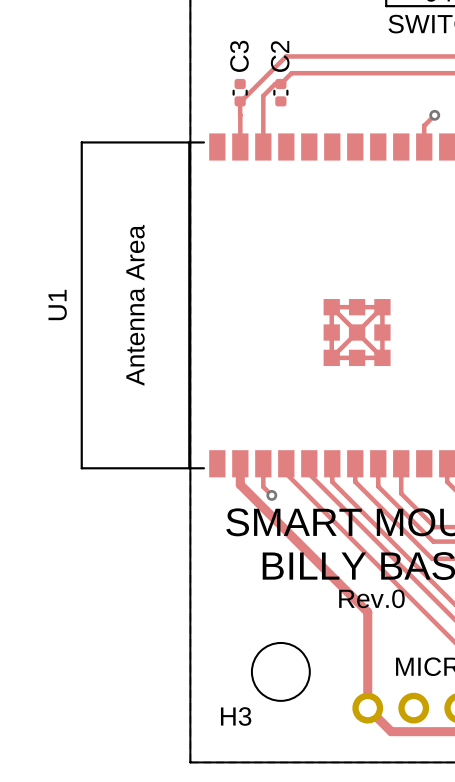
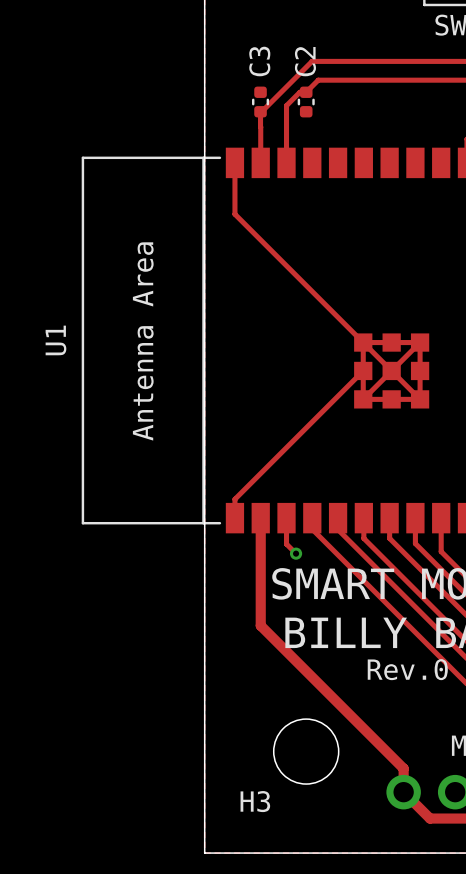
track: none -> (234, 162) (234, 214) (363, 342)
track: none -> (363, 370) (234, 499) (234, 518)
track: (240, 484) (367, 612) (367, 687) -> (260, 541) (260, 625) (403, 768)

